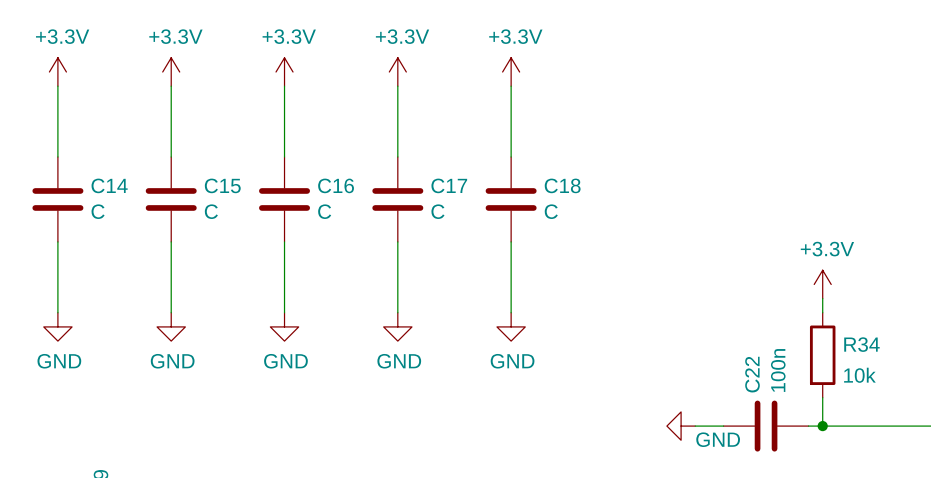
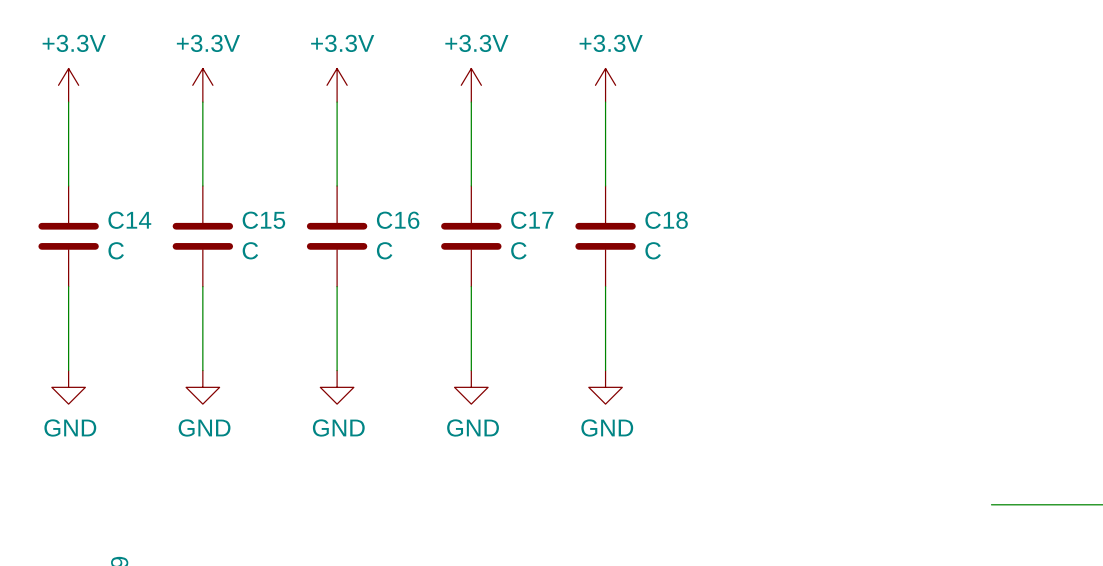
power symbol: +3.3V (822, 284) -> none
wire: (822, 298) (822, 312) -> none
R34: 10k (822, 355) -> none
wire: (822, 397) (822, 426) -> none
power symbol: GND (681, 426) -> none
wire: (695, 426) (723, 426) -> none
C22: 100n (766, 426) -> none
wire: (808, 426) (836, 426) -> none
junction: (822, 426) -> none

